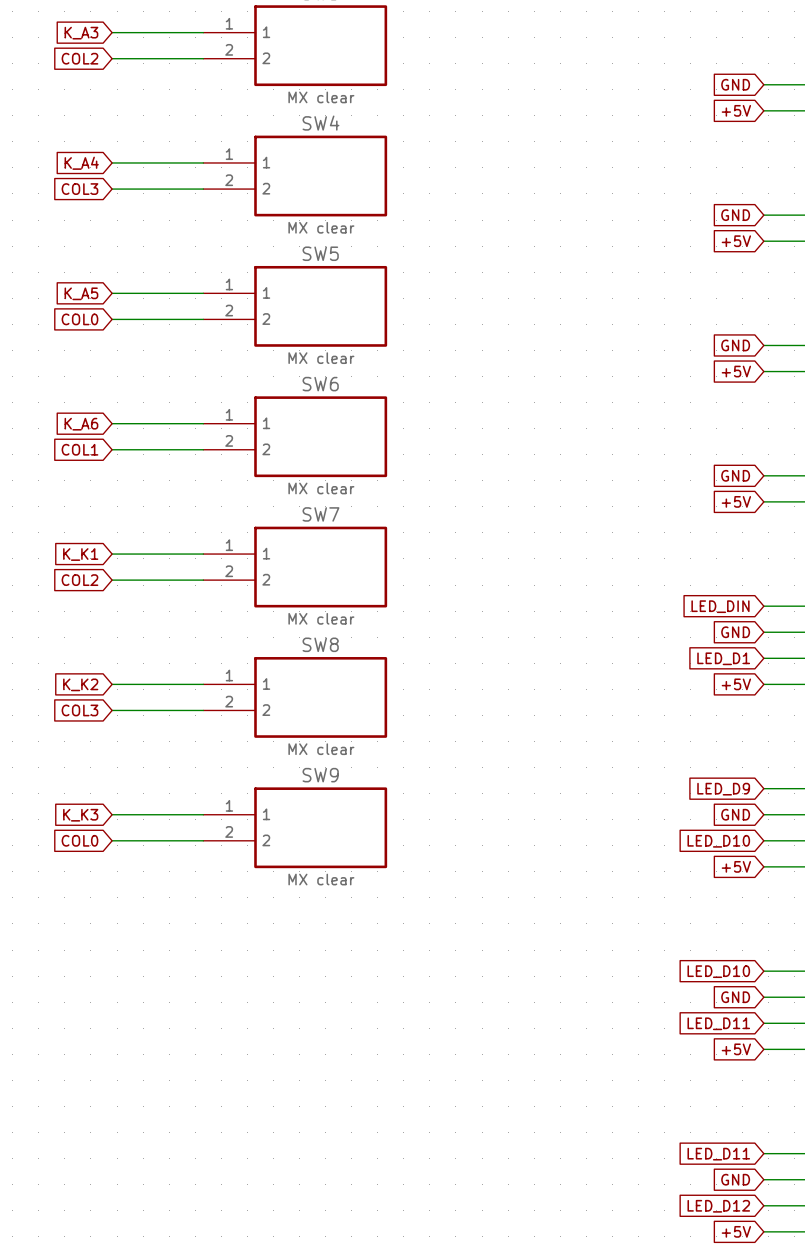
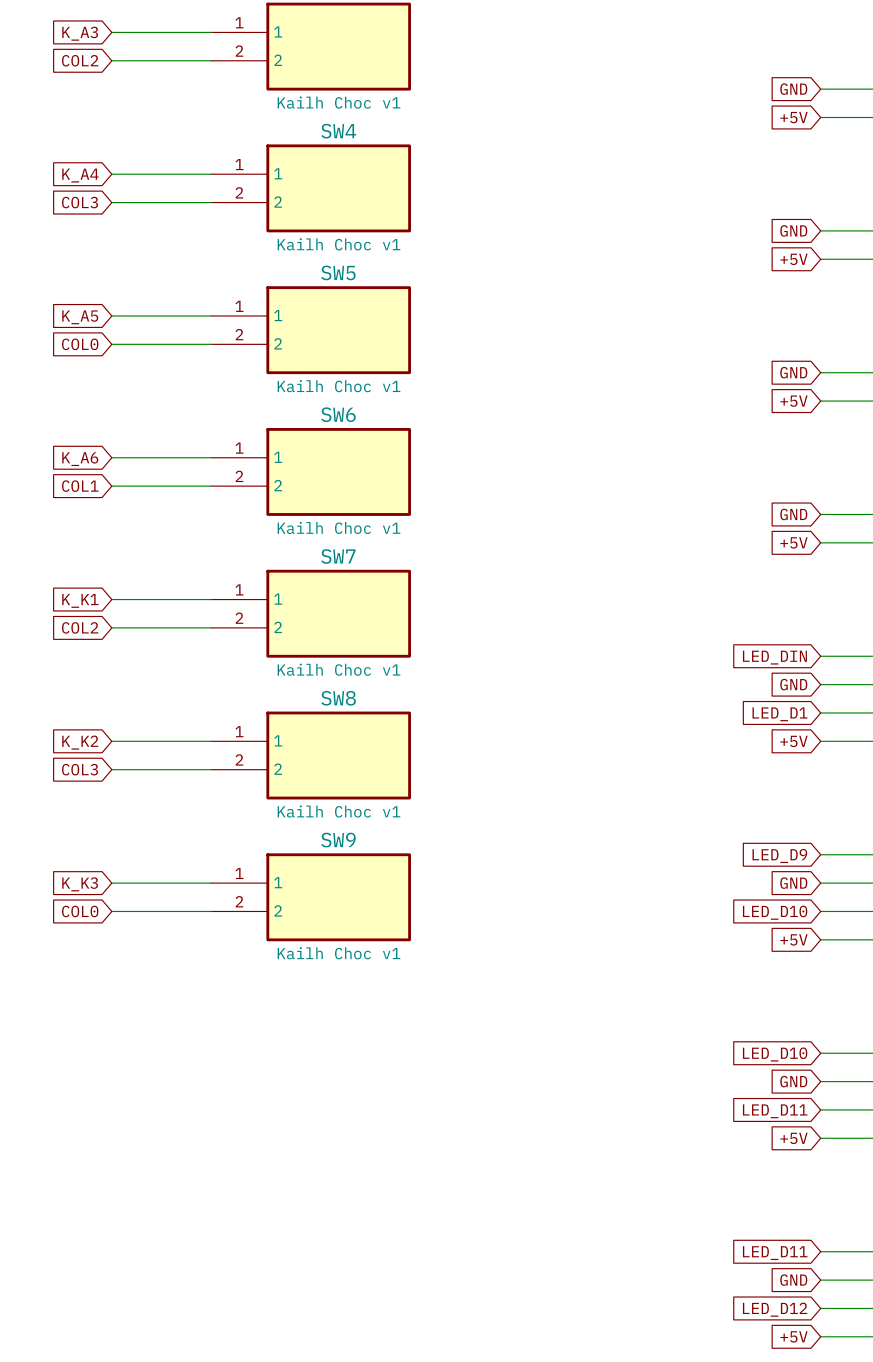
part value: MX clear (321, 97) -> Kailh Choc v1 (338, 102)
SW4 value: MX clear (321, 227) -> Kailh Choc v1 (338, 244)
SW5 value: MX clear (321, 358) -> Kailh Choc v1 (338, 386)
SW6 value: MX clear (321, 488) -> Kailh Choc v1 (338, 527)
SW7 value: MX clear (321, 618) -> Kailh Choc v1 (338, 669)
SW8 value: MX clear (321, 749) -> Kailh Choc v1 (338, 811)
SW9 value: MX clear (321, 879) -> Kailh Choc v1 (338, 953)

